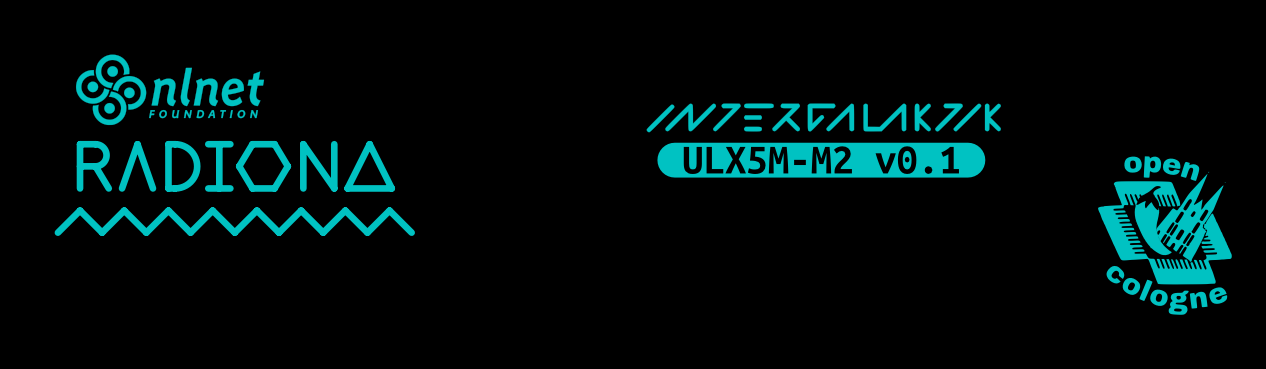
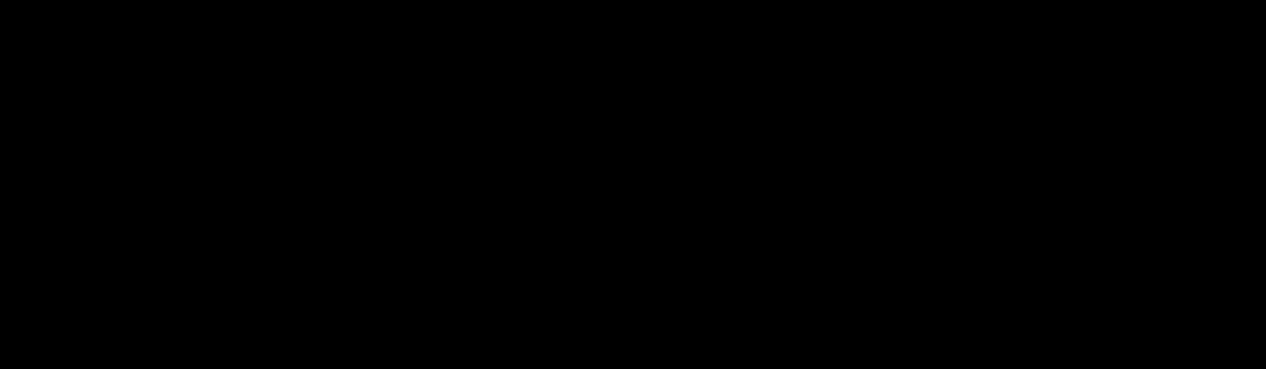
drawing: [54, 54, 415, 236] -> none
drawing: [646, 103, 1001, 178] -> none
drawing: [1098, 156, 1232, 315] -> none

